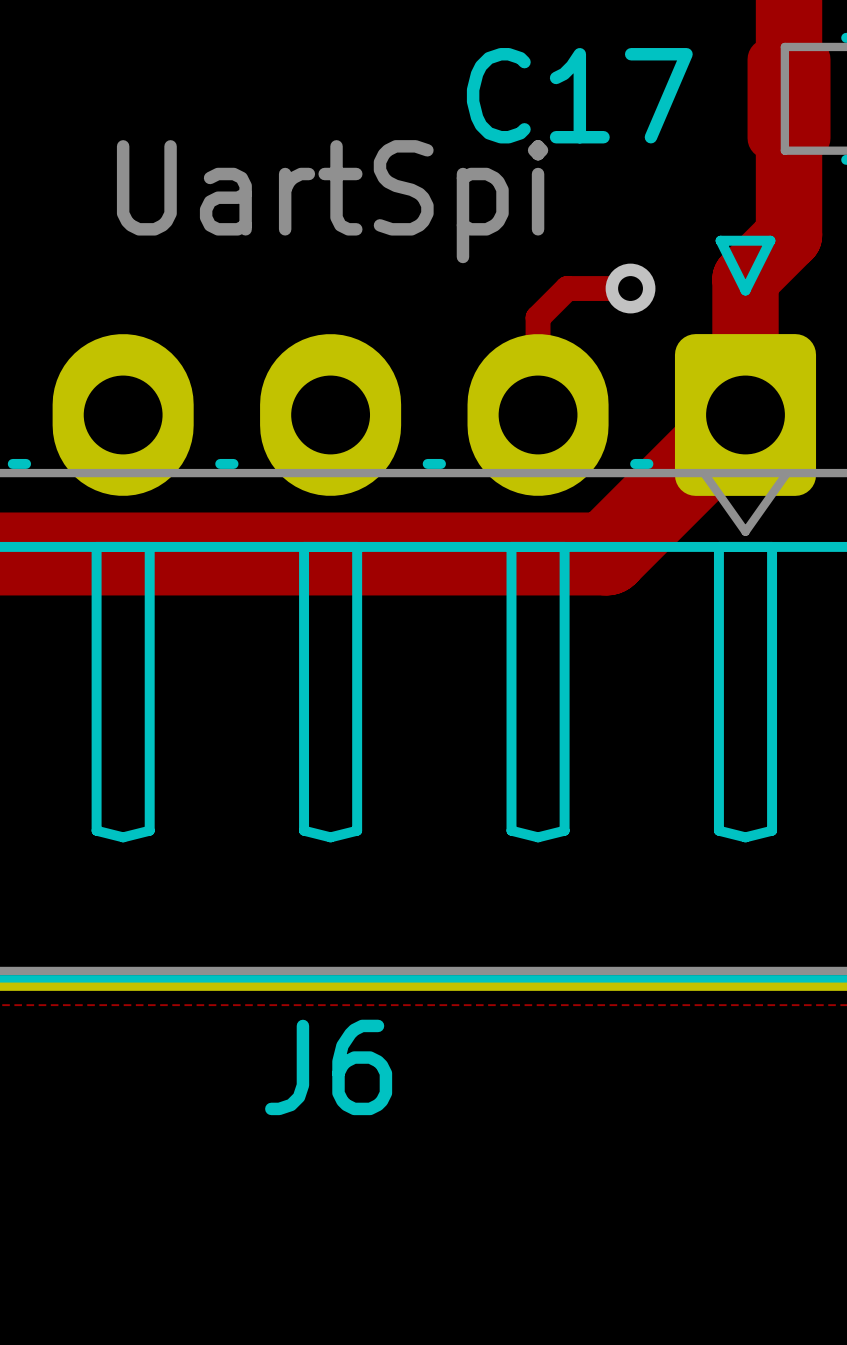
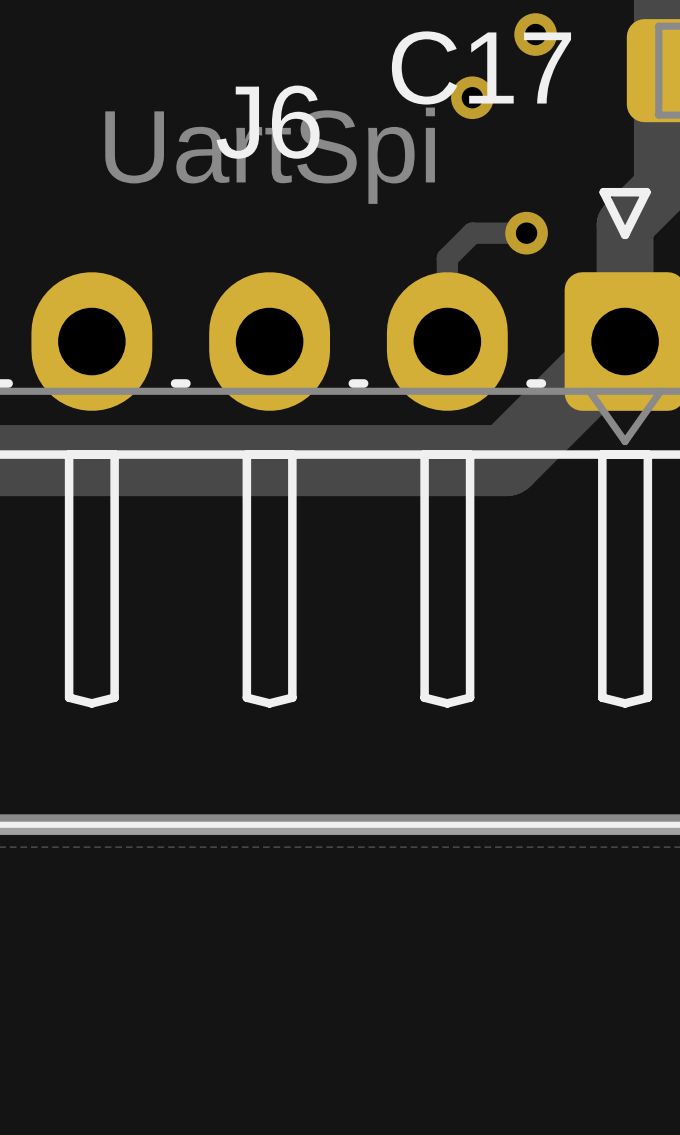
via: none -> (535, 34)
via: none -> (472, 97)
J6 name position: J6 (328, 1067) -> J6 (268, 122)

